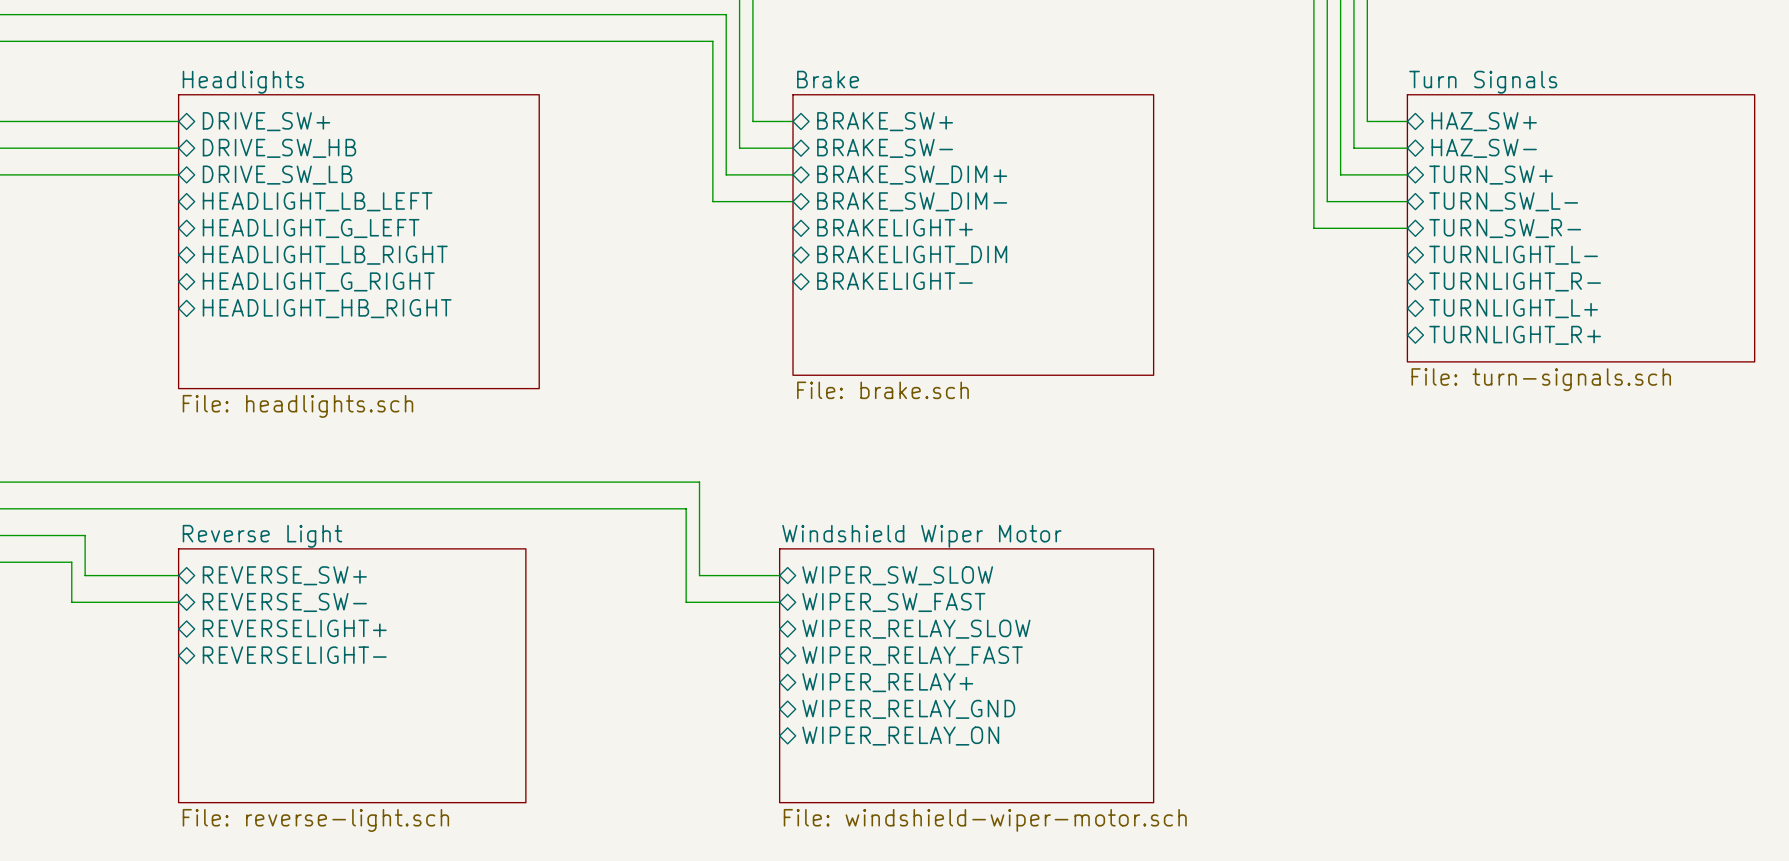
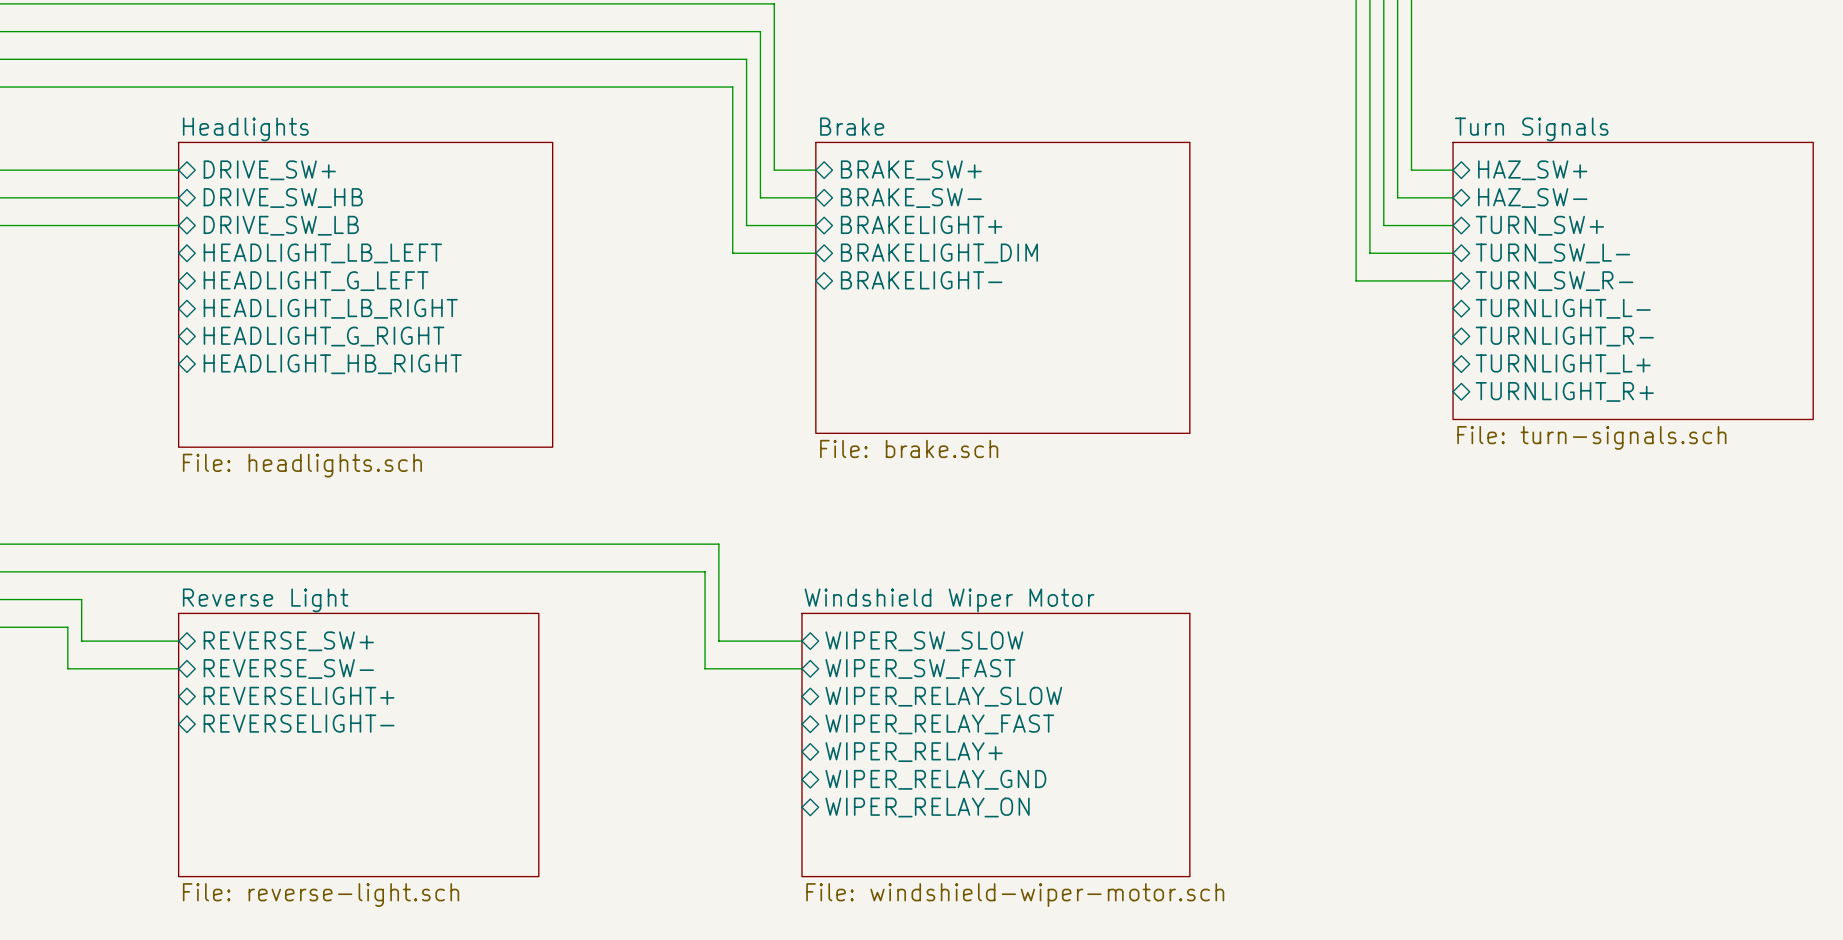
sheet pin: BRAKE_SW_DIM+ (912, 175) -> BRAKELIGHT+ (921, 224)
sheet pin: BRAKE_SW_DIM- (912, 201) -> BRAKELIGHT_DIM (939, 253)
sheet pin: BRAKELIGHT+ (894, 227) -> BRAKELIGHT- (921, 280)
sheet pin: BRAKELIGHT_DIM (912, 255) -> none
sheet pin: BRAKELIGHT- (894, 281) -> none

